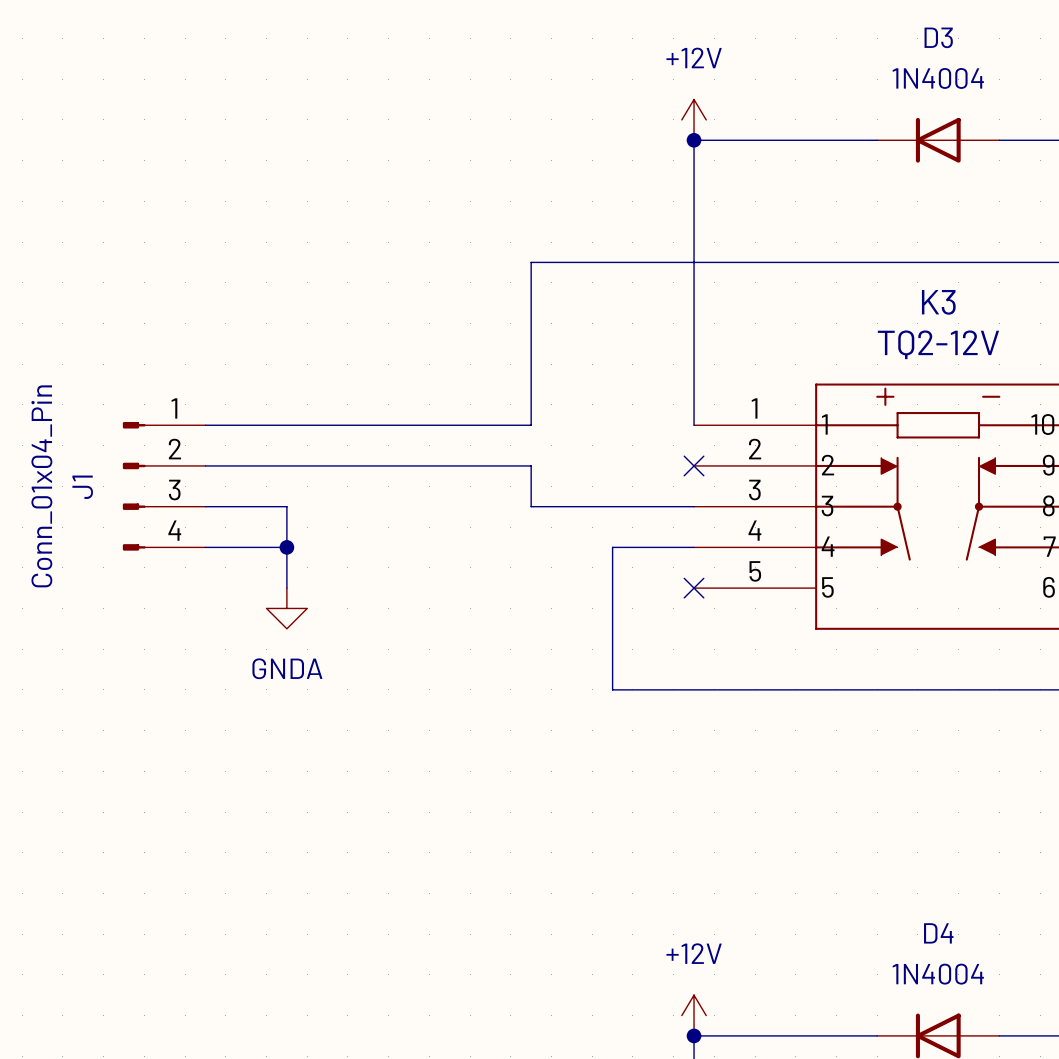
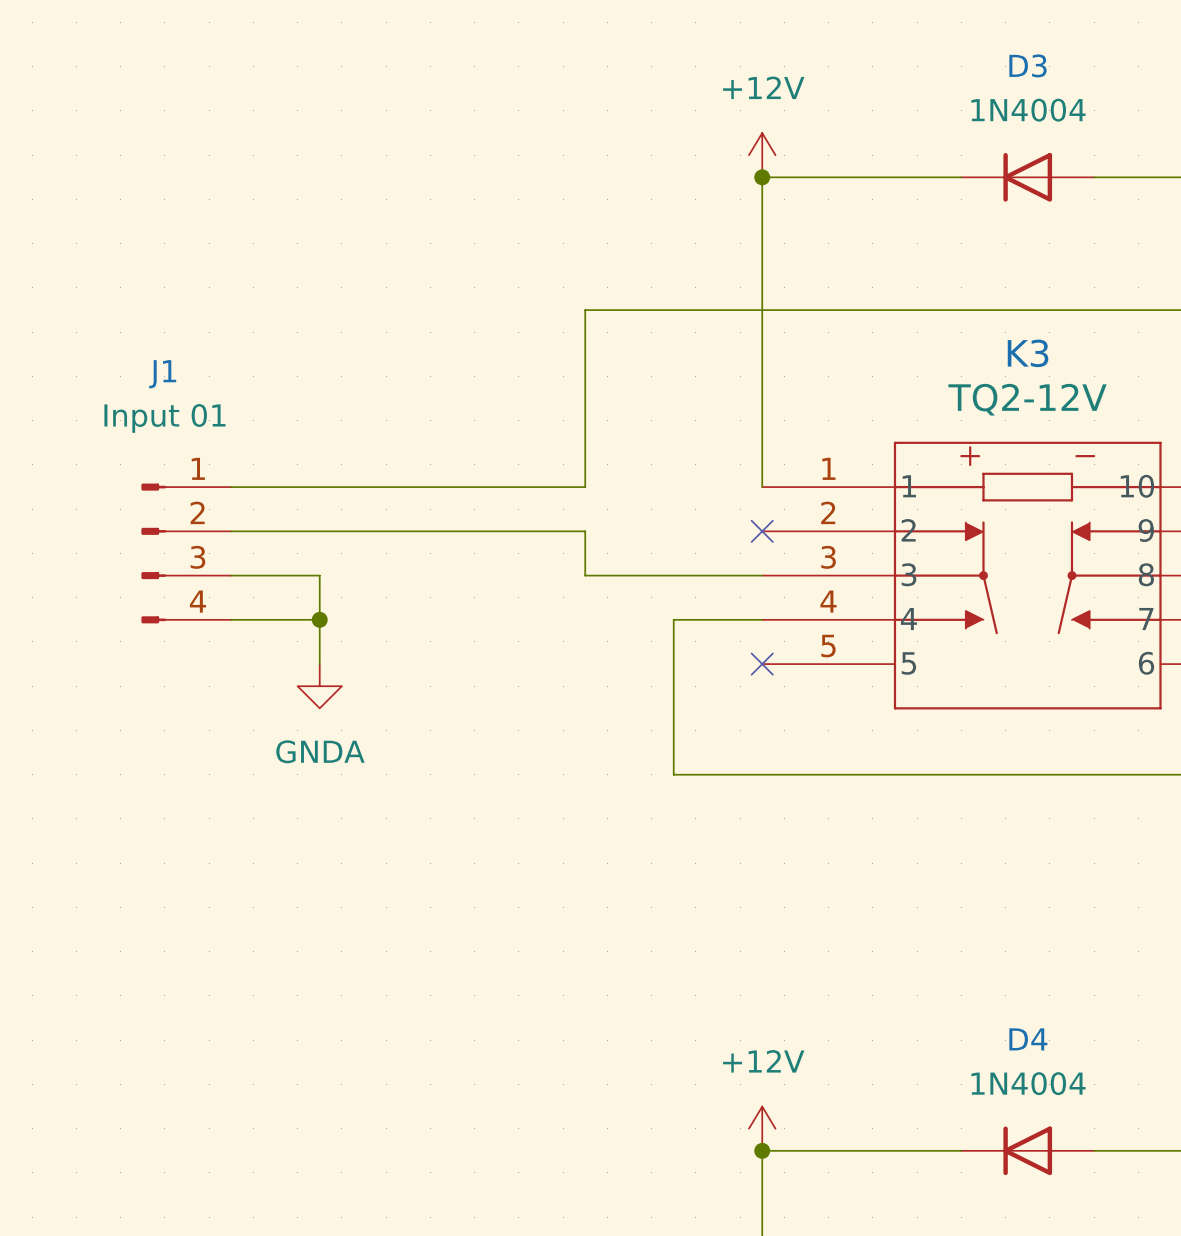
J1 value: Conn_01x04_Pin (41, 486) -> Input 01 (164, 418)
J1 name rotation: 0° (82, 487) -> 90° clockwise (162, 374)
J1 name position: J1 (82, 487) -> J1 (162, 374)

